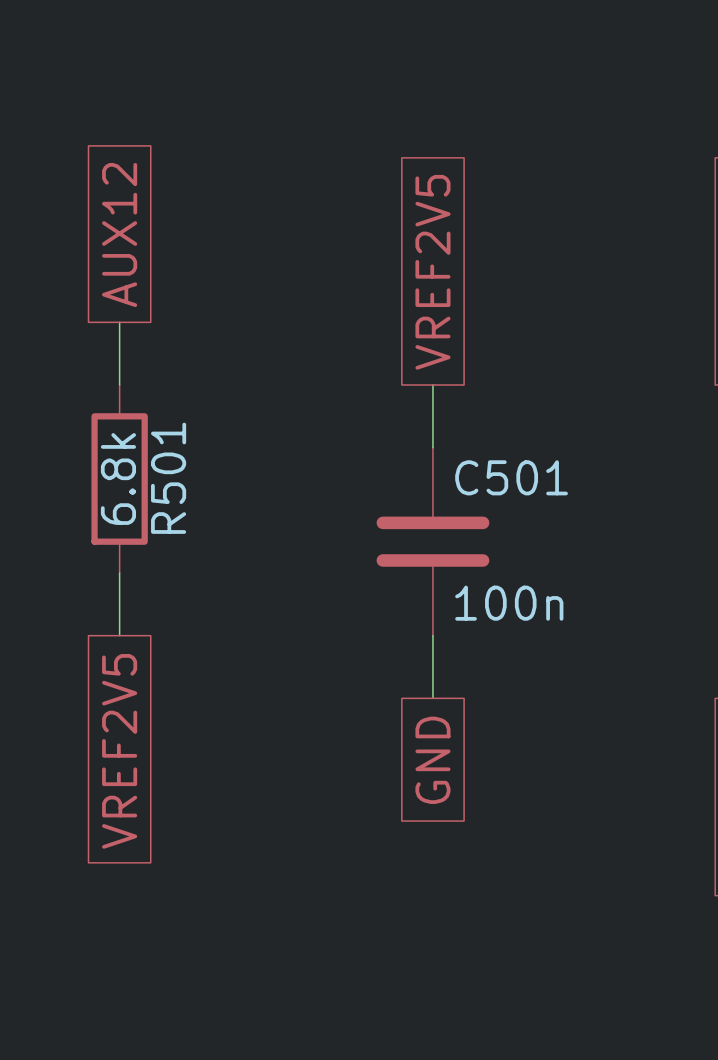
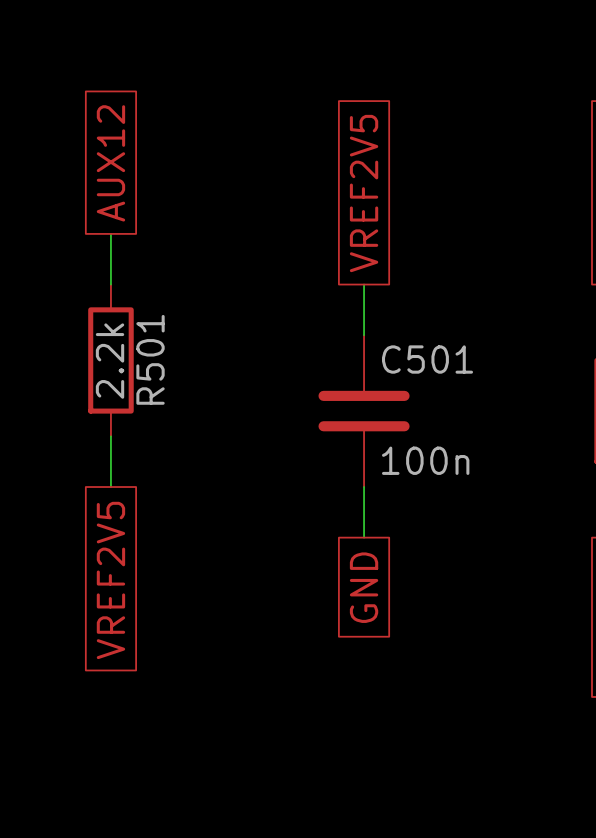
R501 value: 6.8k (118, 479) -> 2.2k (110, 361)

